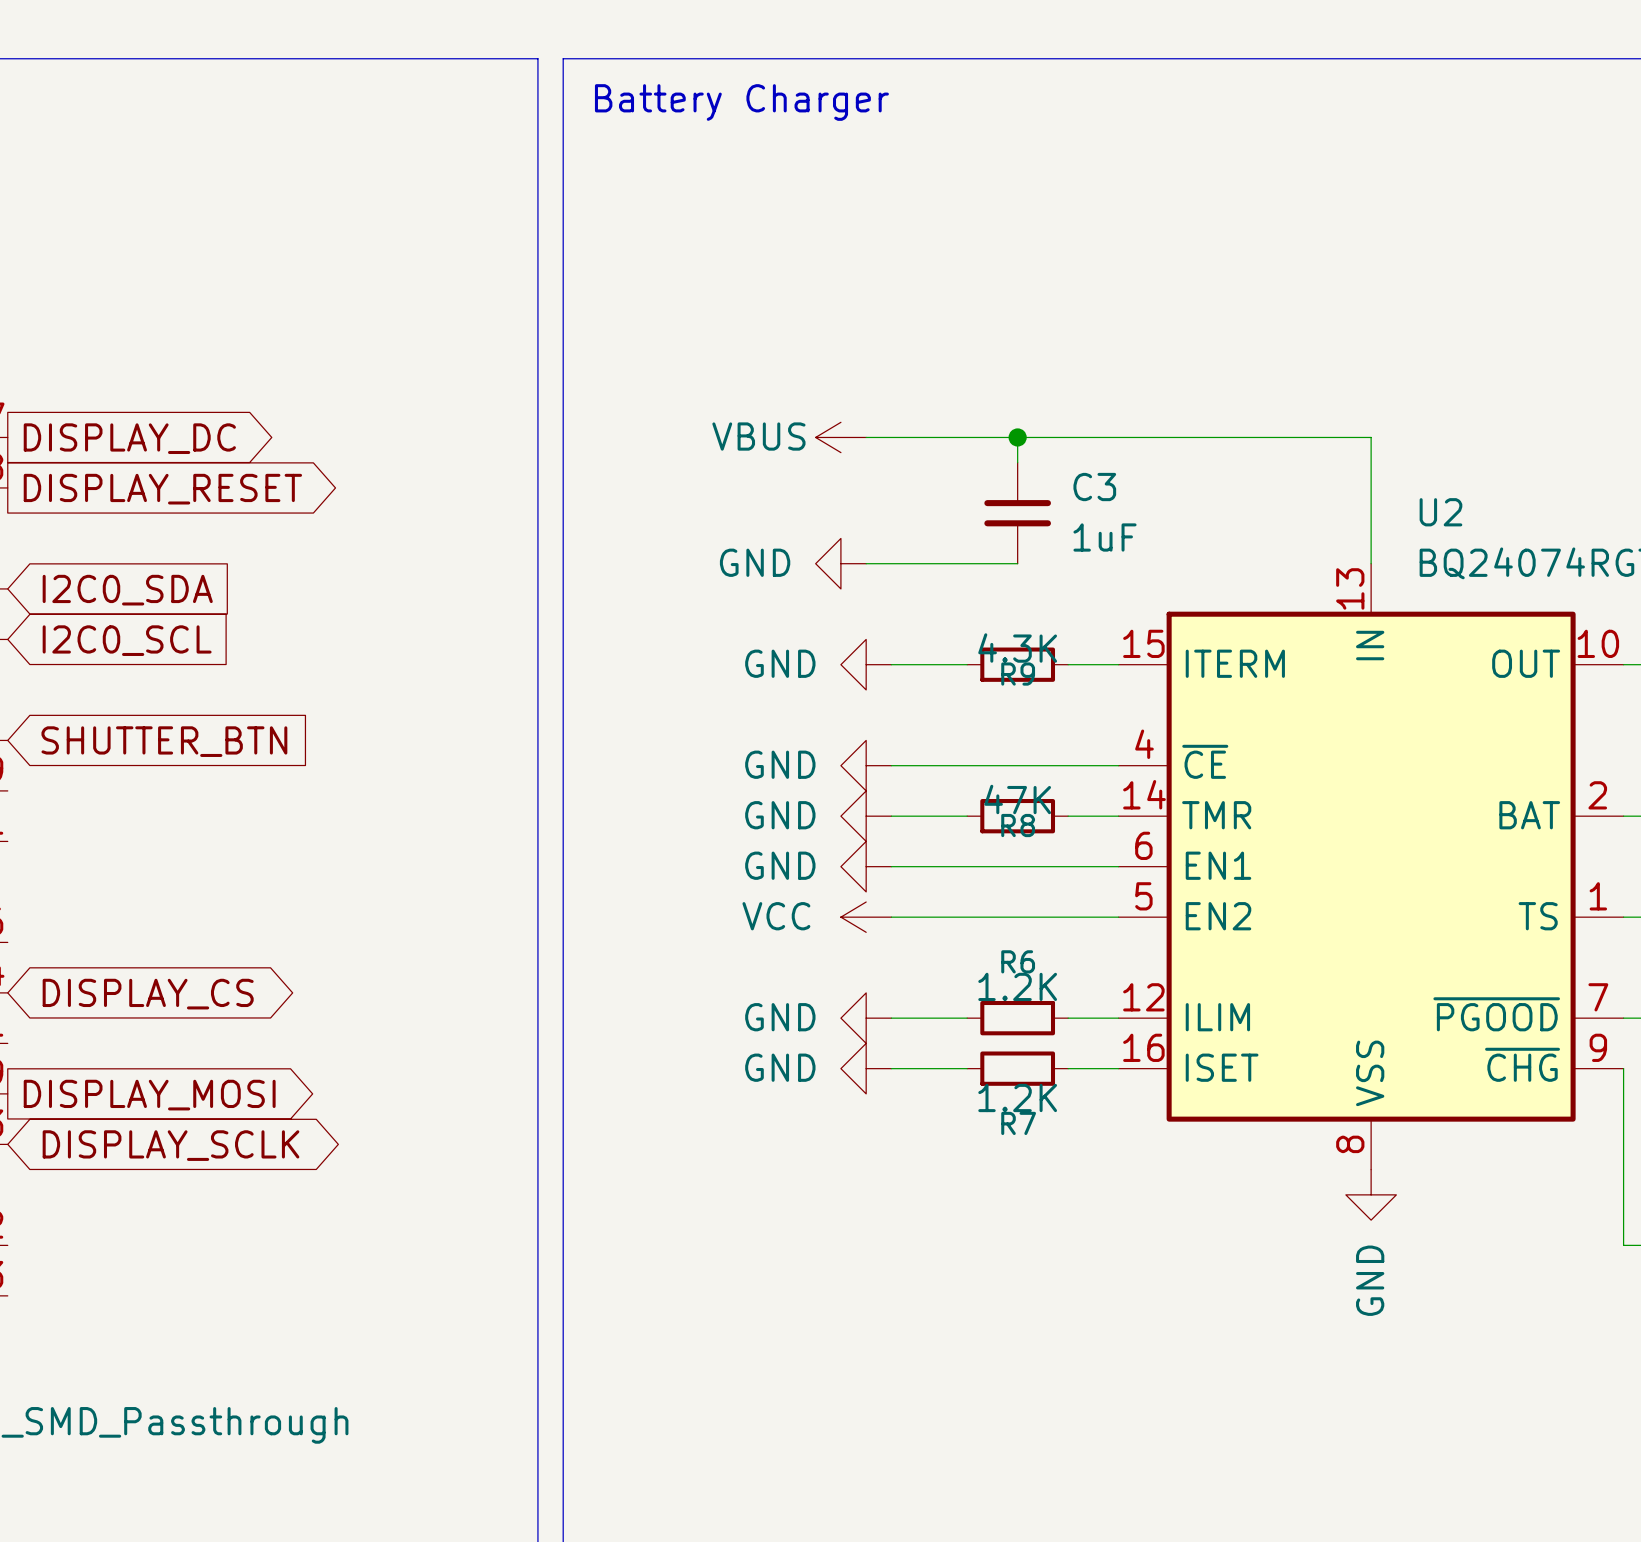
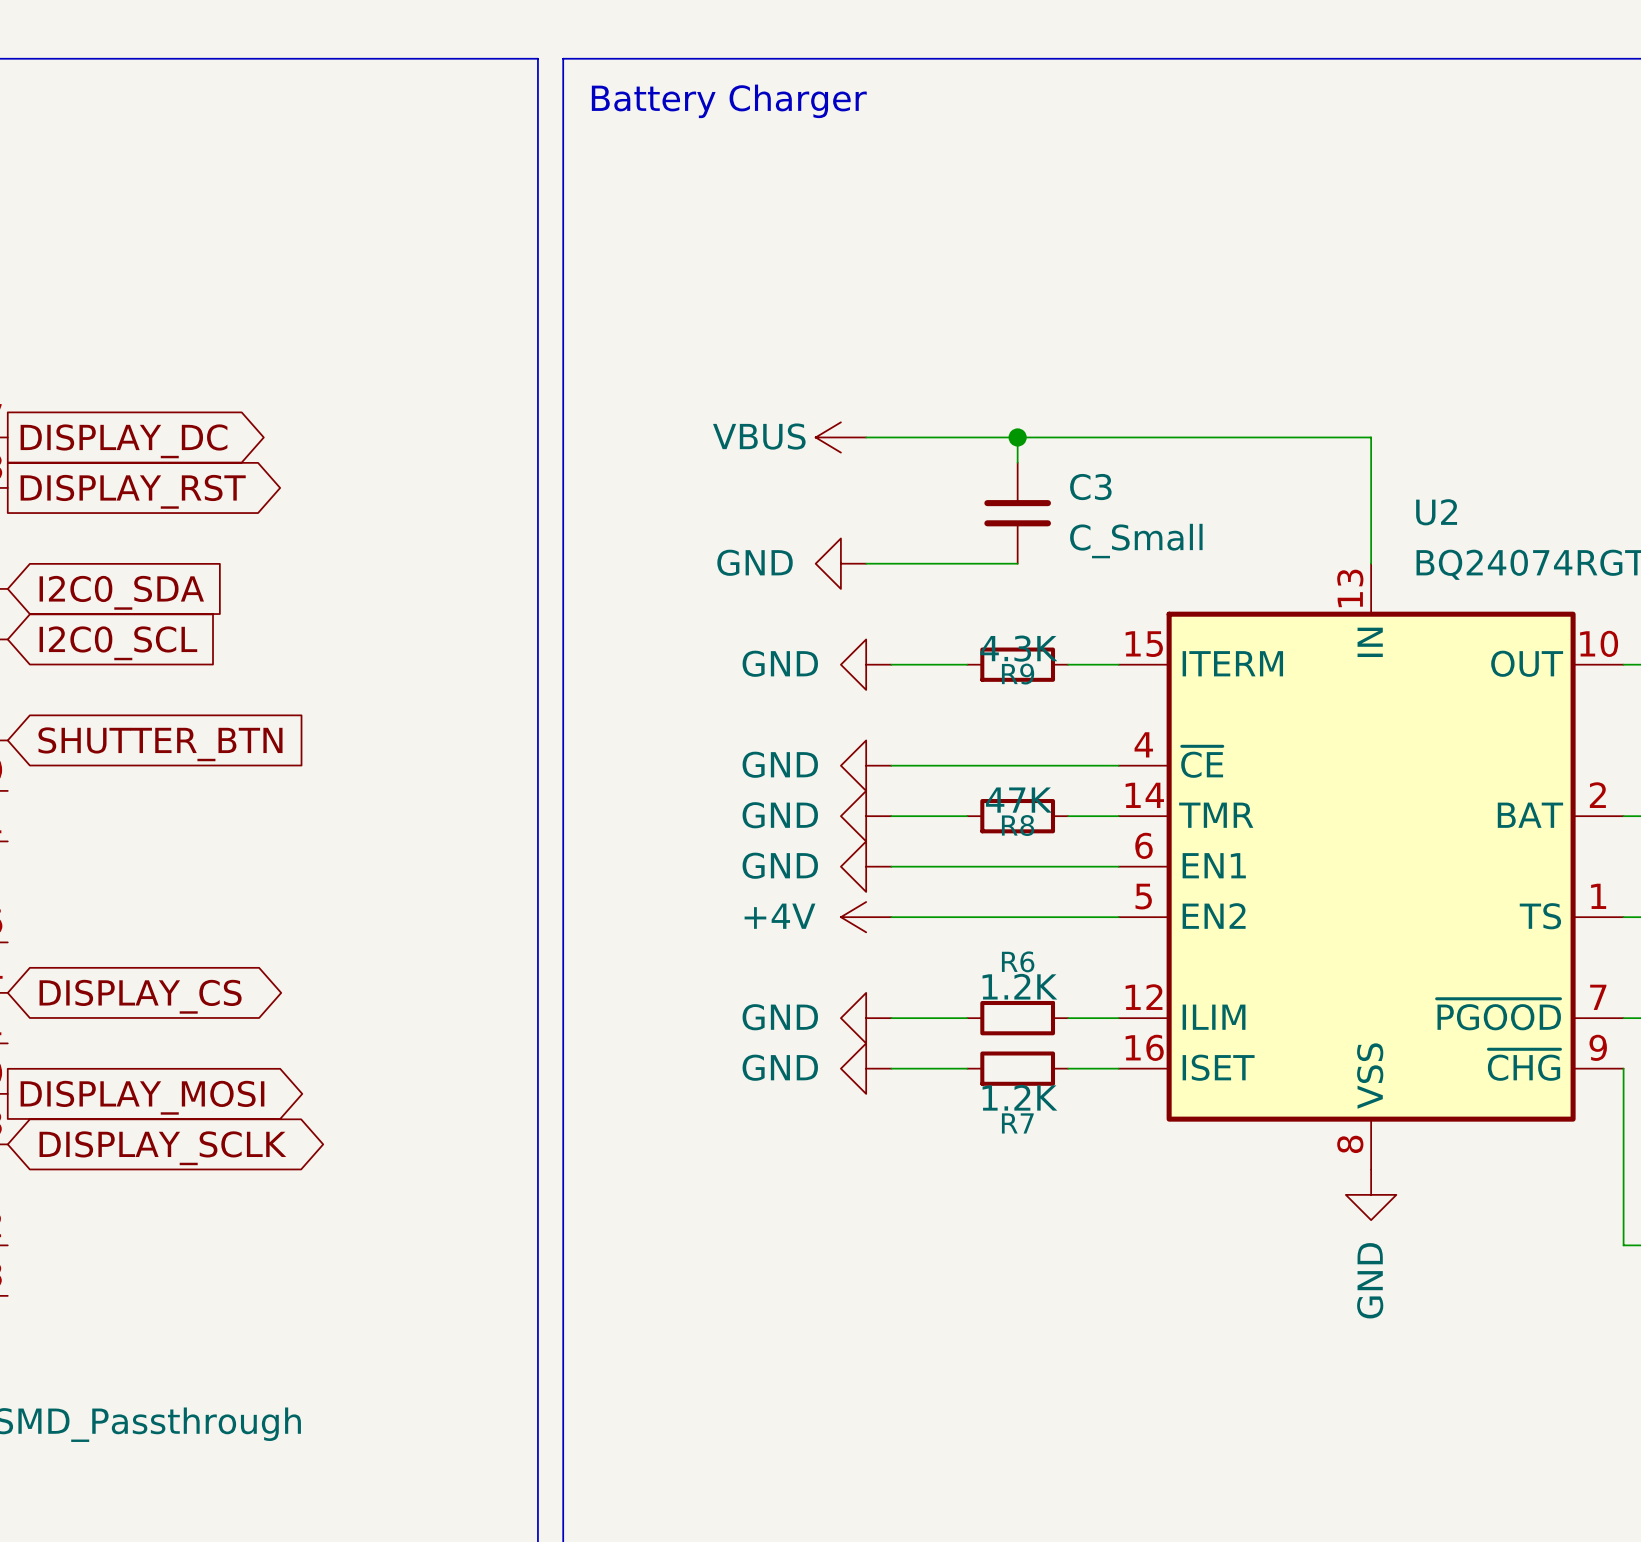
global label: DISPLAY_RESET (162, 489) -> DISPLAY_RST (133, 491)
C3 value: 1uF (1105, 537) -> C_Small (1136, 541)
power symbol: VCC (866, 917) -> +4V (866, 917)

